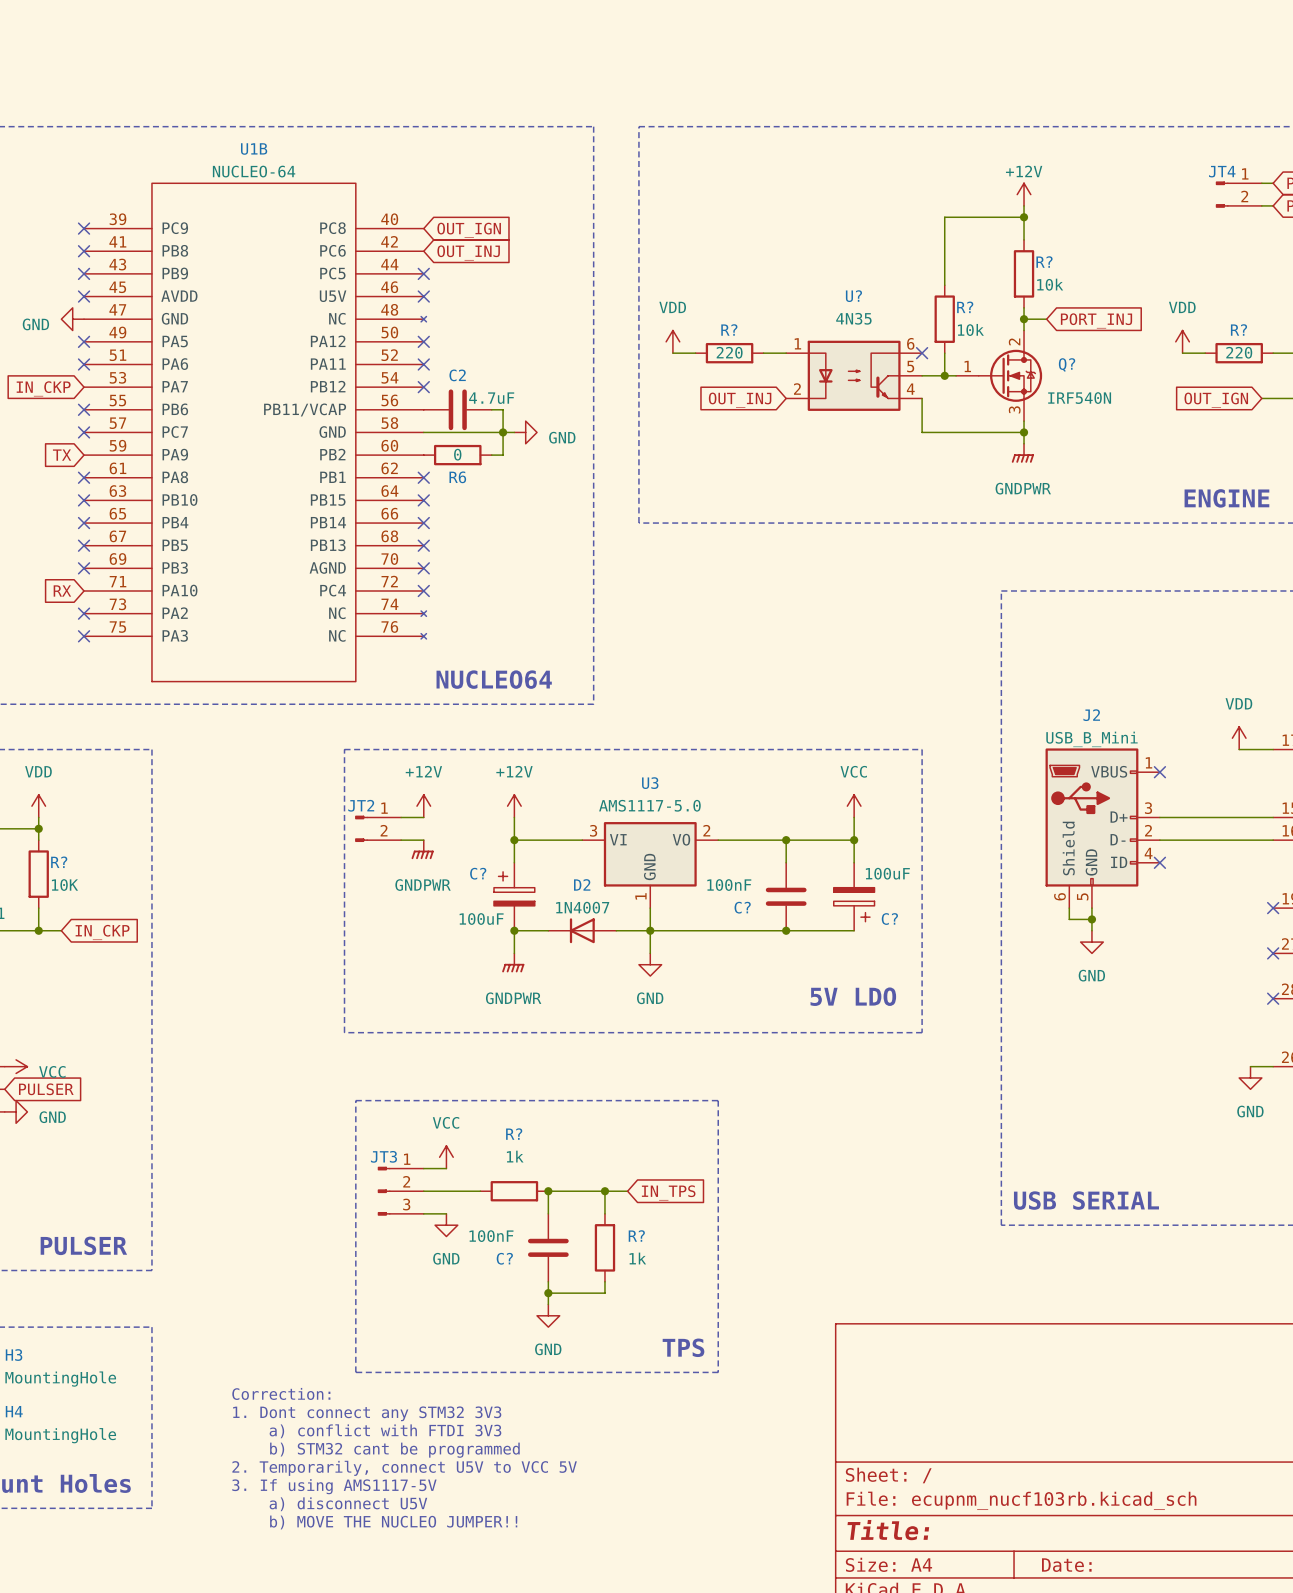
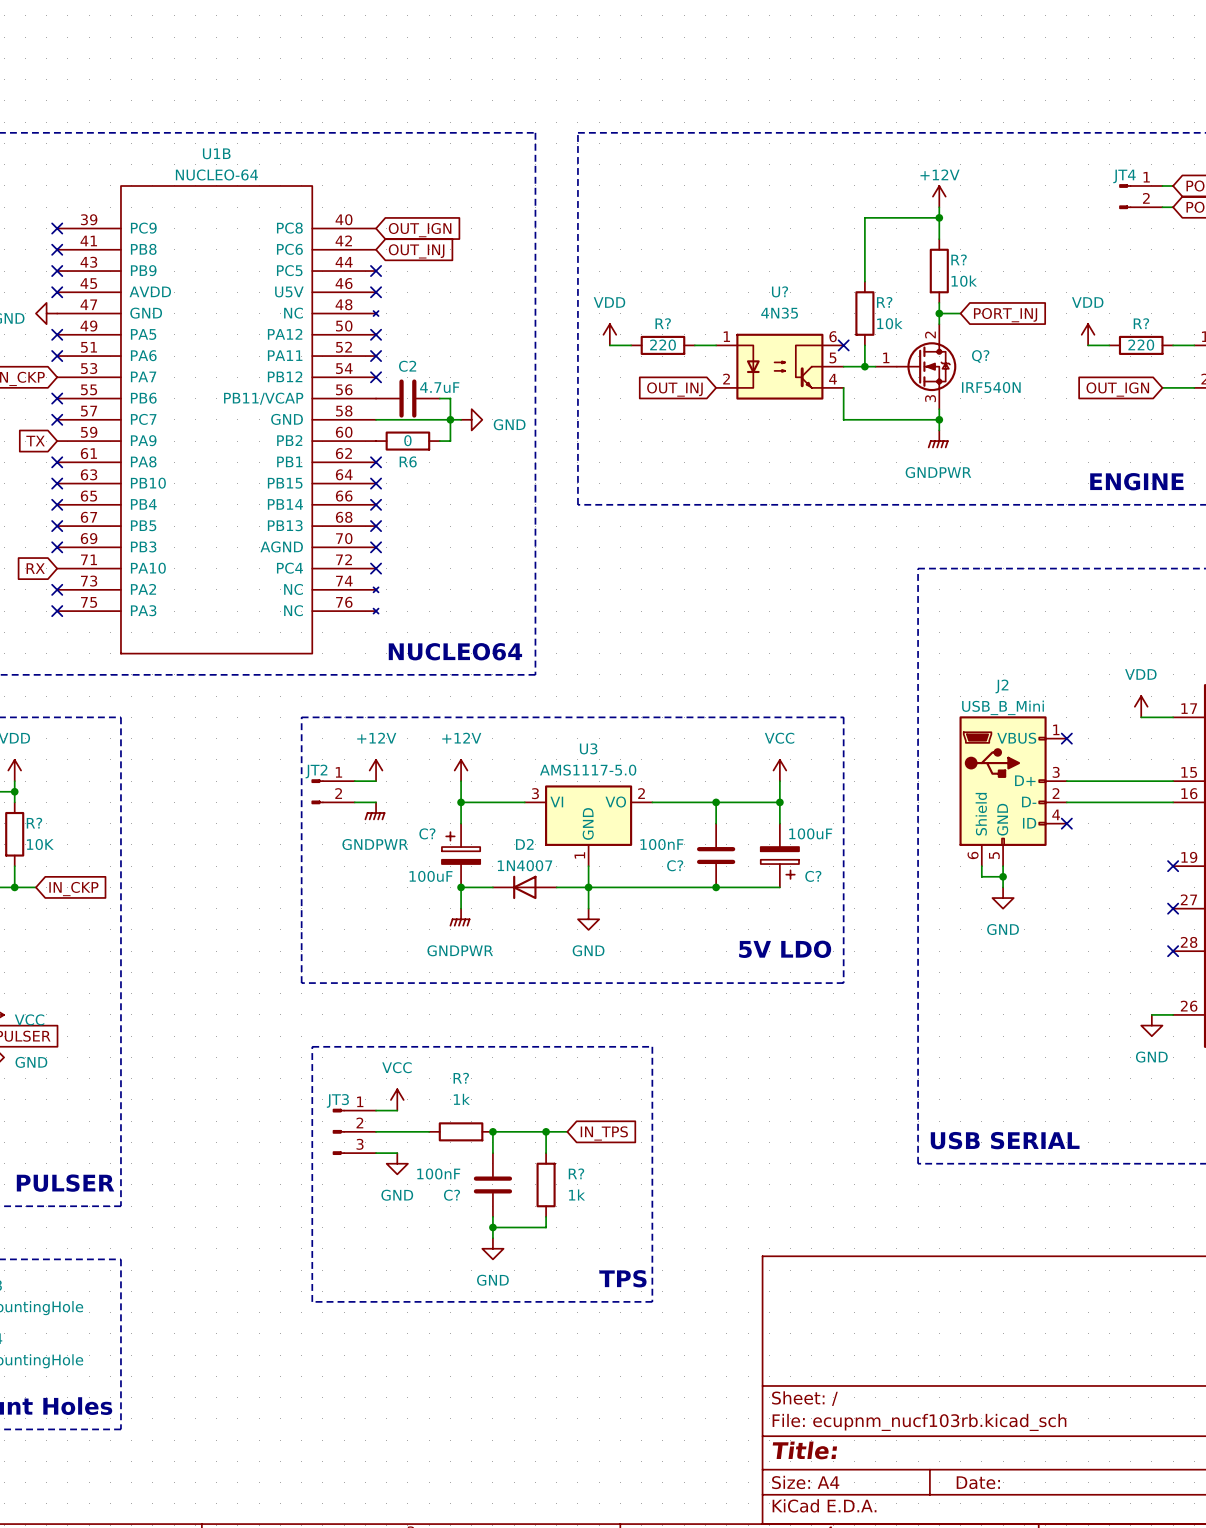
text: Correction: (281, 1393) -> none
text: 1. Dont connect any STM32 3V3 (367, 1413) -> none
text: a) conflict with FTDI 3V3 (385, 1431) -> none
text: b) STM32 cant be programmed (394, 1450) -> none
text: 2. Temporarily, connect U5V to VCC 5V (404, 1468) -> none
text: 3. If using AMS1117-5V (334, 1486) -> none
text: a) disconnect U5V (348, 1504) -> none
text: b) MOVE THE NUCLEO JUMPER!! (393, 1522) -> none

